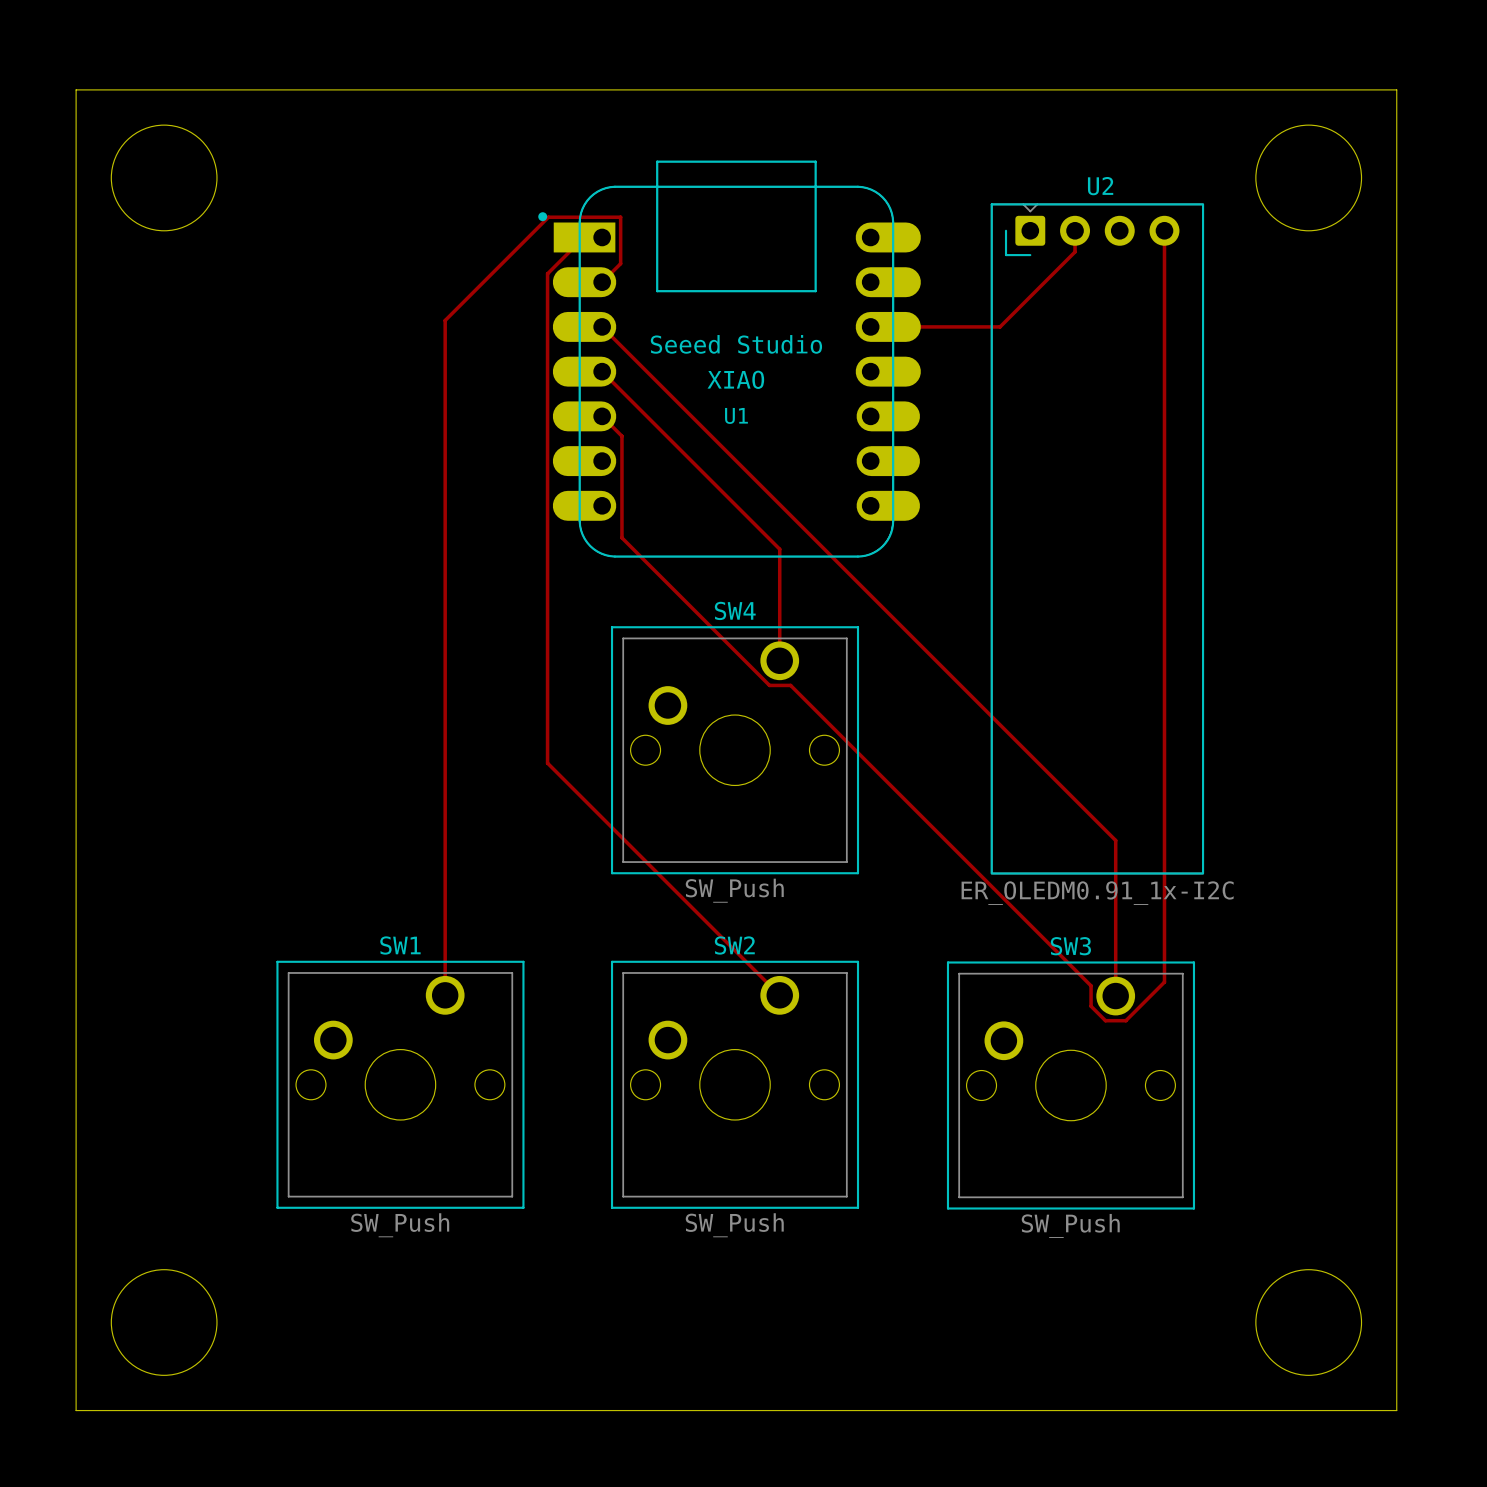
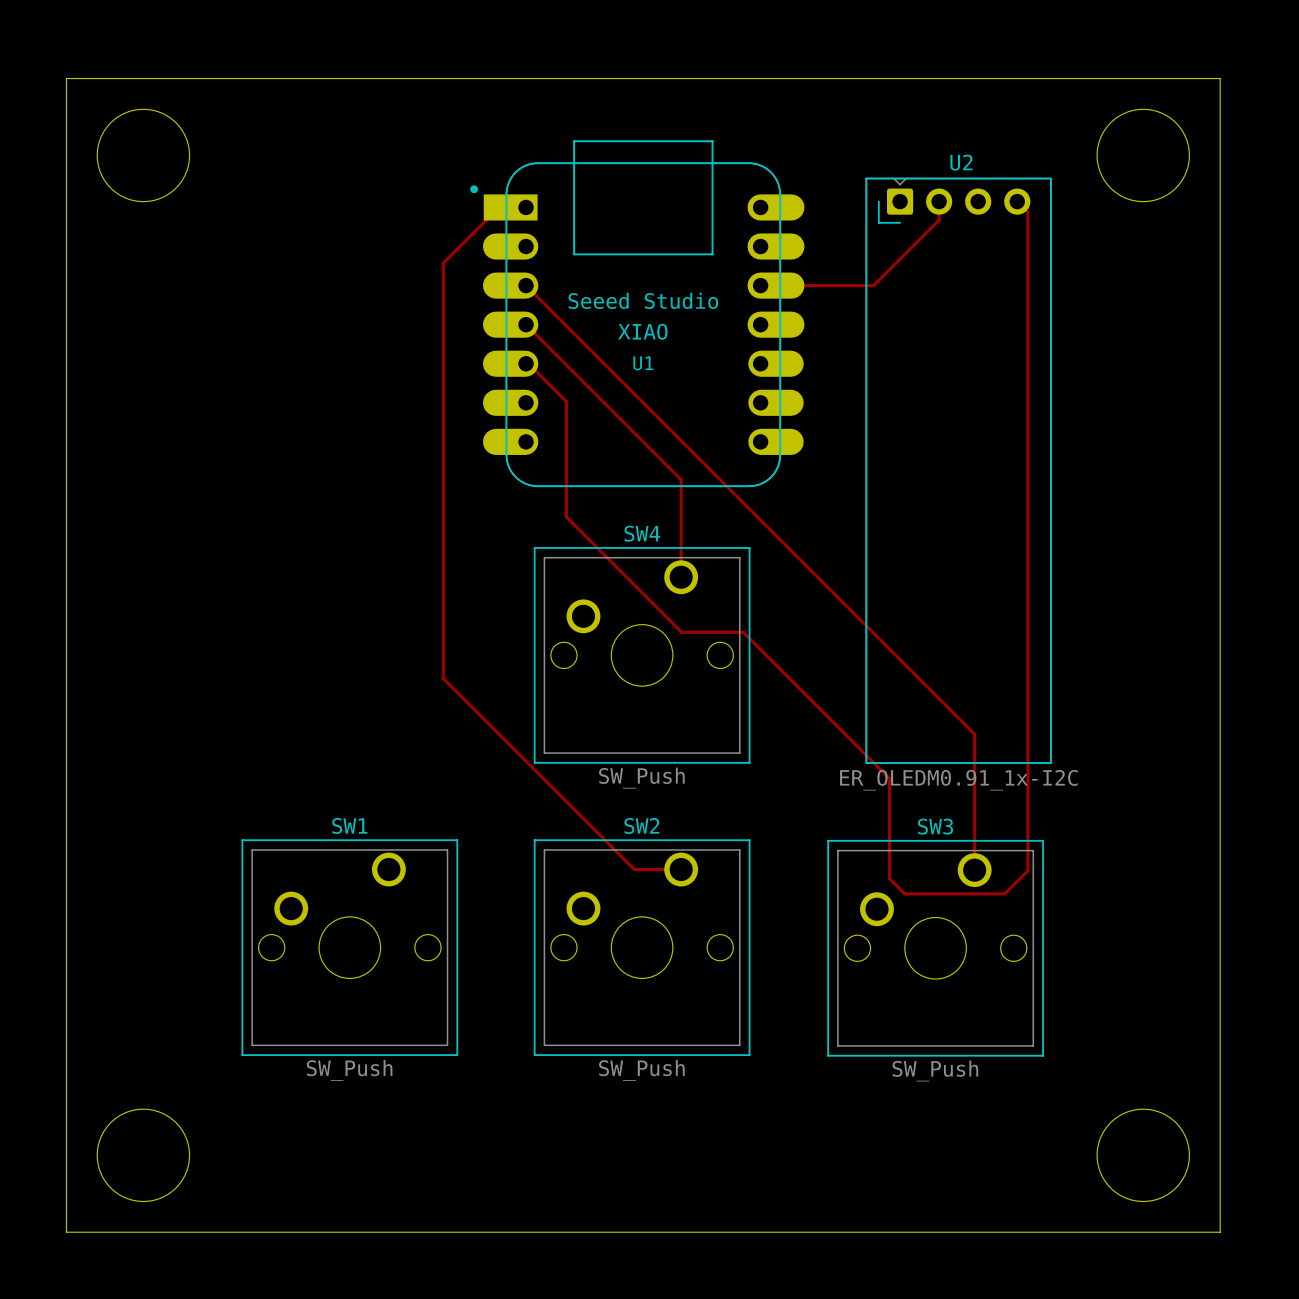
track: (1164, 230) (1164, 982) (1125, 1020) (1105, 1020) (1091, 1006) (1091, 985) (790, 685) (769, 685) (621, 537) (621, 436) (602, 416) -> (1017, 201) (1027, 212) (1027, 870) (1004, 893) (904, 893) (889, 878) (889, 778) (743, 632) (681, 632) (566, 516) (566, 401) (528, 363) (526, 363)
track: (583, 237) (547, 273) (547, 763) (779, 995) -> (510, 207) (499, 207) (443, 263) (443, 678) (634, 869) (681, 869)
track: (602, 282) (620, 263) (620, 217) (548, 217) (445, 320) (445, 995) -> none

